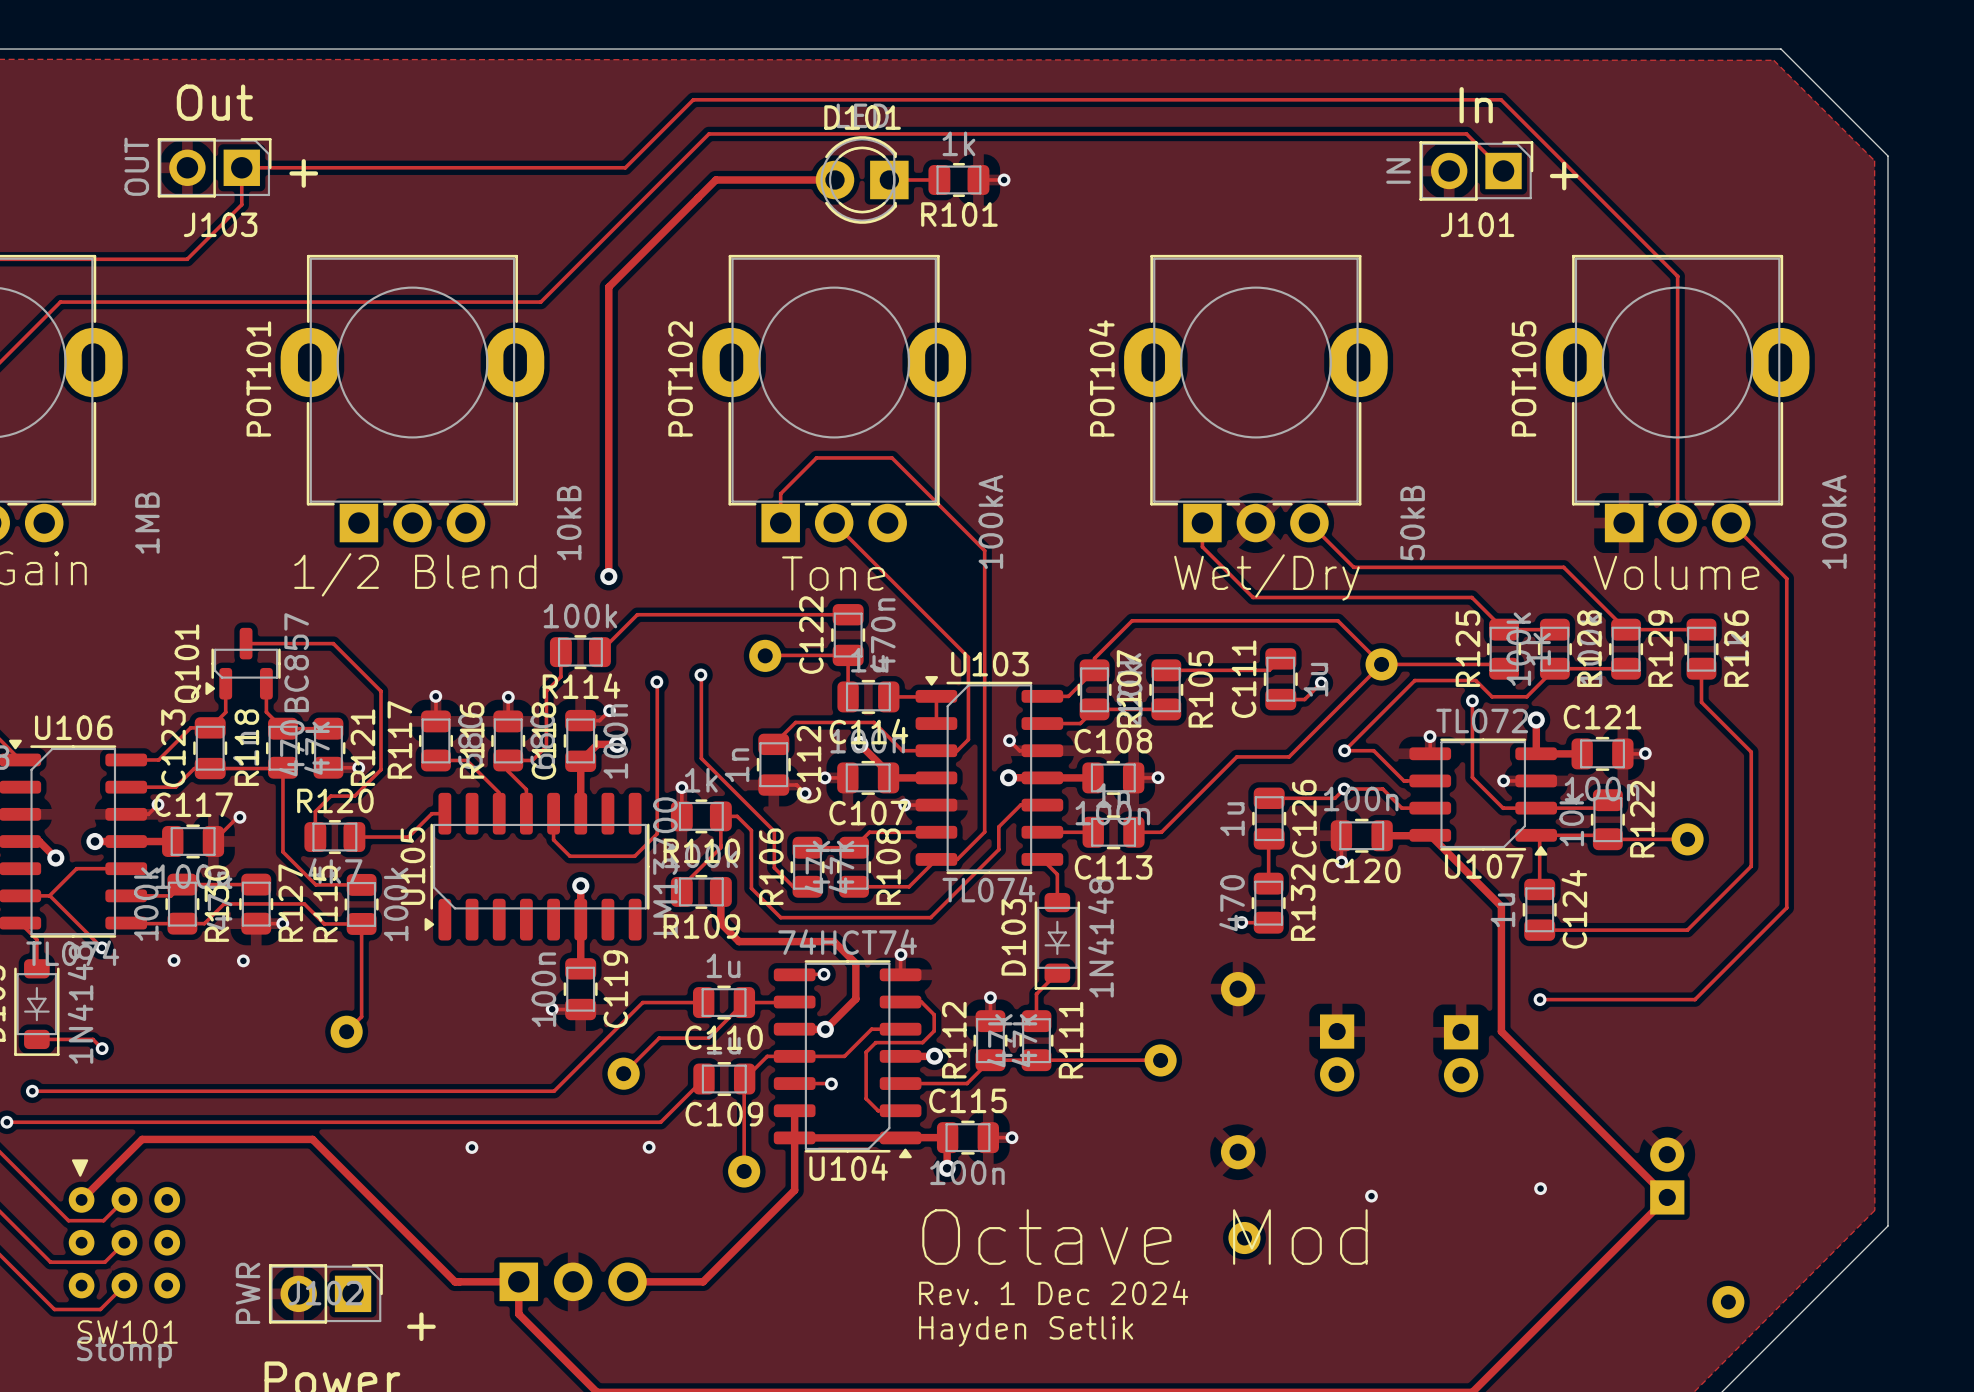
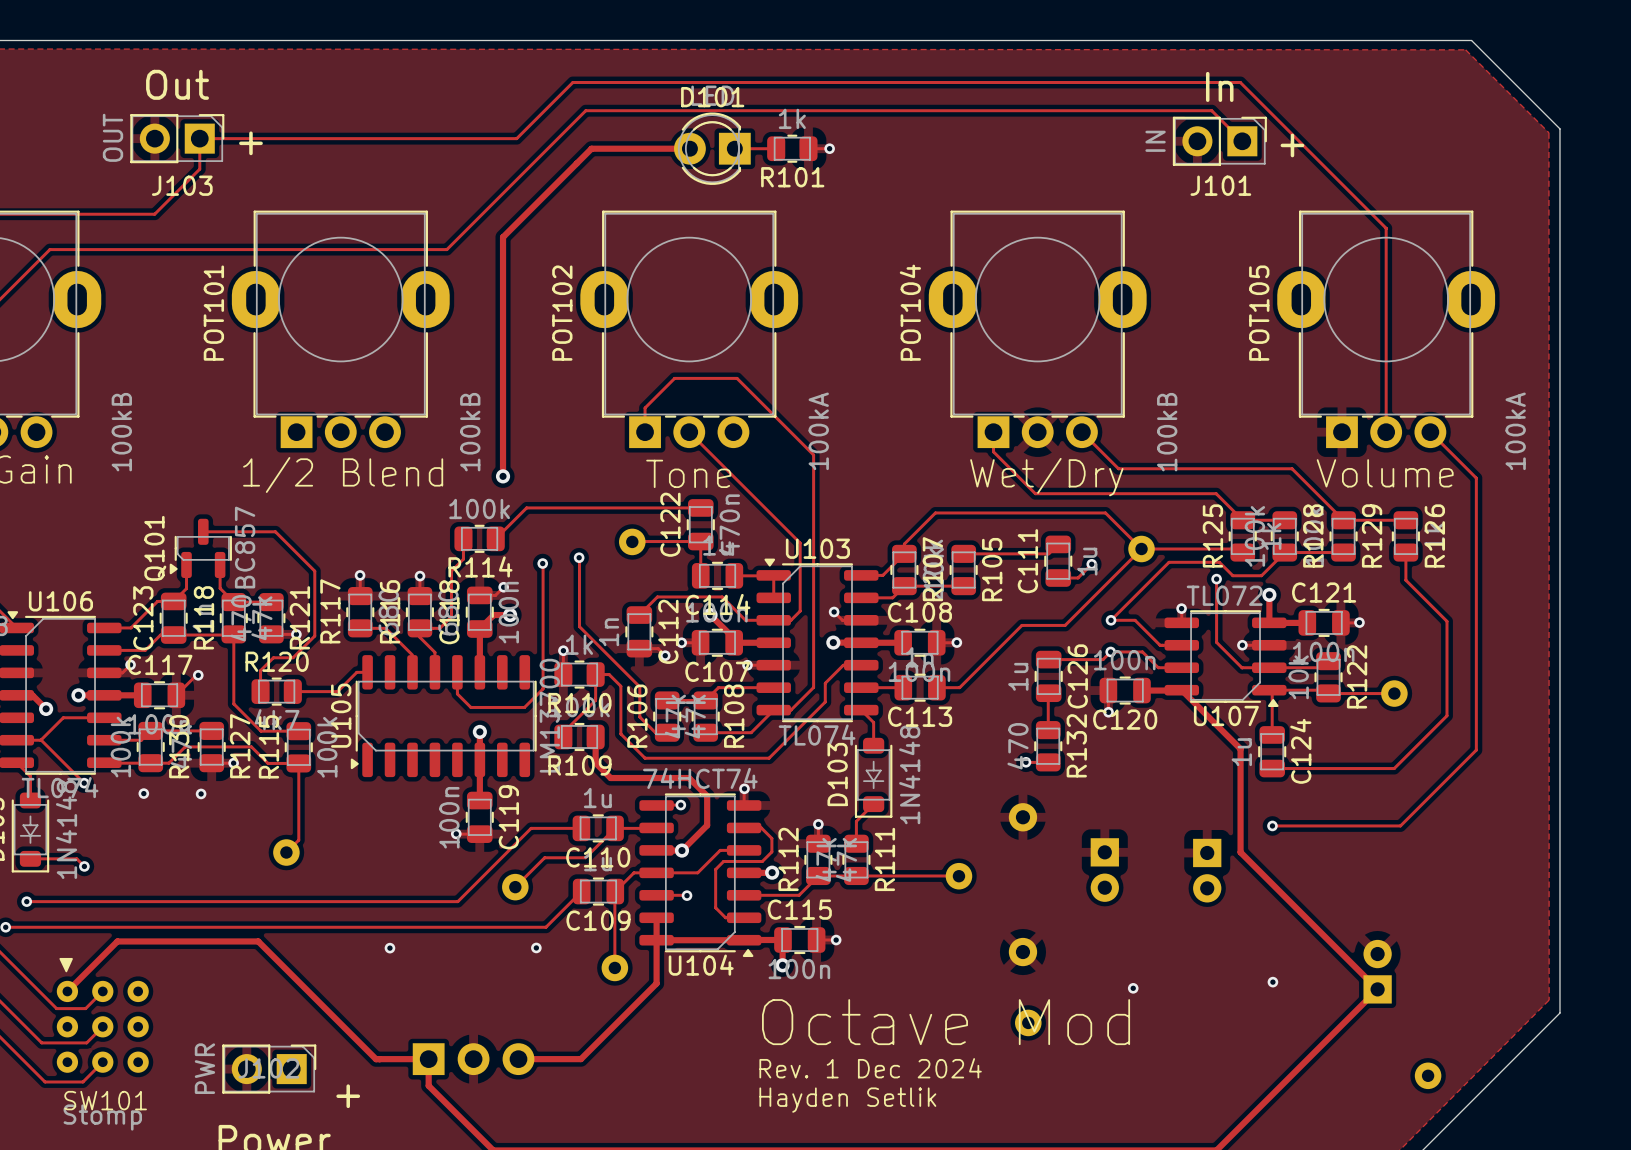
part value: 1MB (147, 523) -> 100kB (121, 432)
POT101 value: 10kB (569, 523) -> 100kB (470, 432)
POT104 value: 50kB (1412, 523) -> 100kB (1167, 432)

